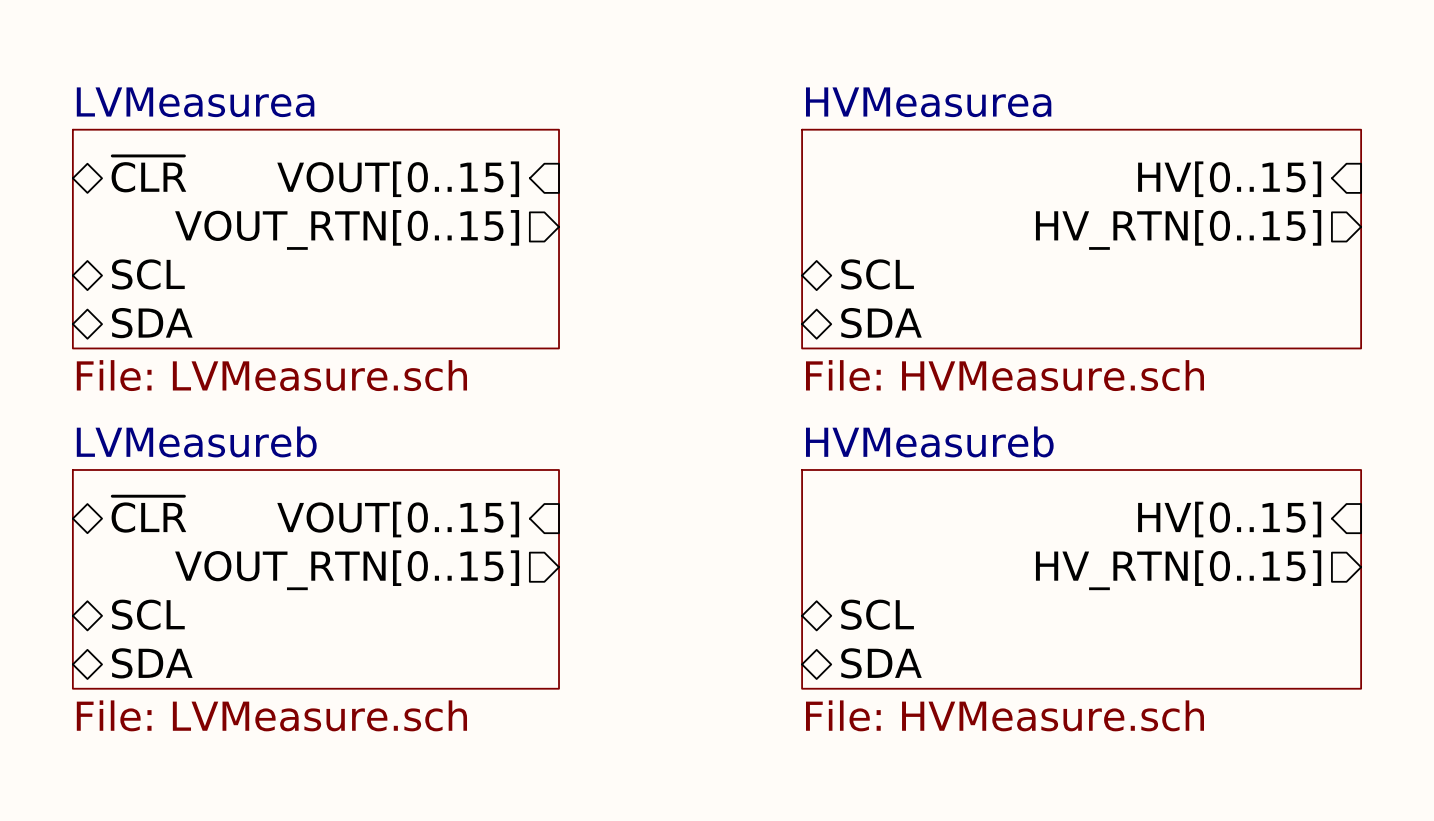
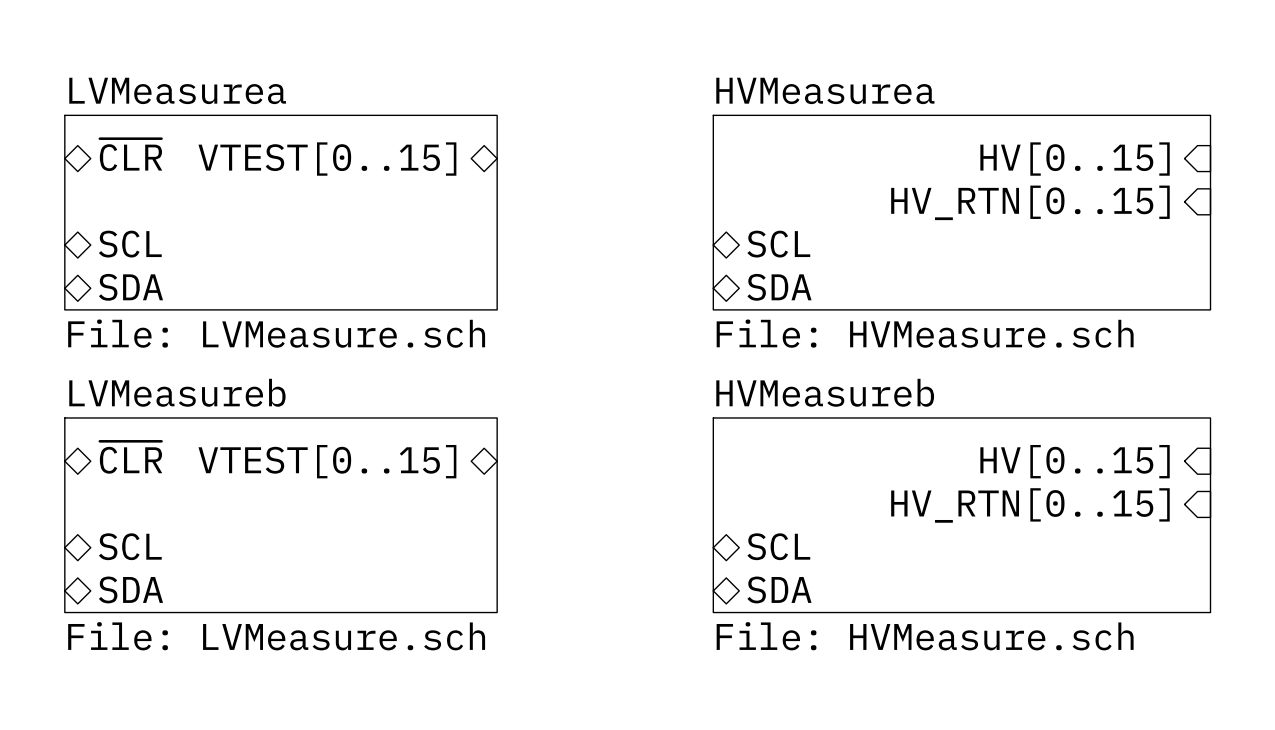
sheet pin shape: input (398, 179) -> bidirectional (327, 159)
sheet pin: VOUT[0..15] (398, 179) -> VTEST[0..15] (327, 159)
sheet pin: VOUT_RTN[0..15] (347, 229) -> none
sheet pin shape: output (1178, 229) -> input (1030, 202)
sheet pin shape: input (398, 519) -> bidirectional (327, 461)
sheet pin: VOUT[0..15] (398, 519) -> VTEST[0..15] (327, 461)
sheet pin: VOUT_RTN[0..15] (347, 570) -> none
sheet pin shape: output (1178, 570) -> input (1030, 505)

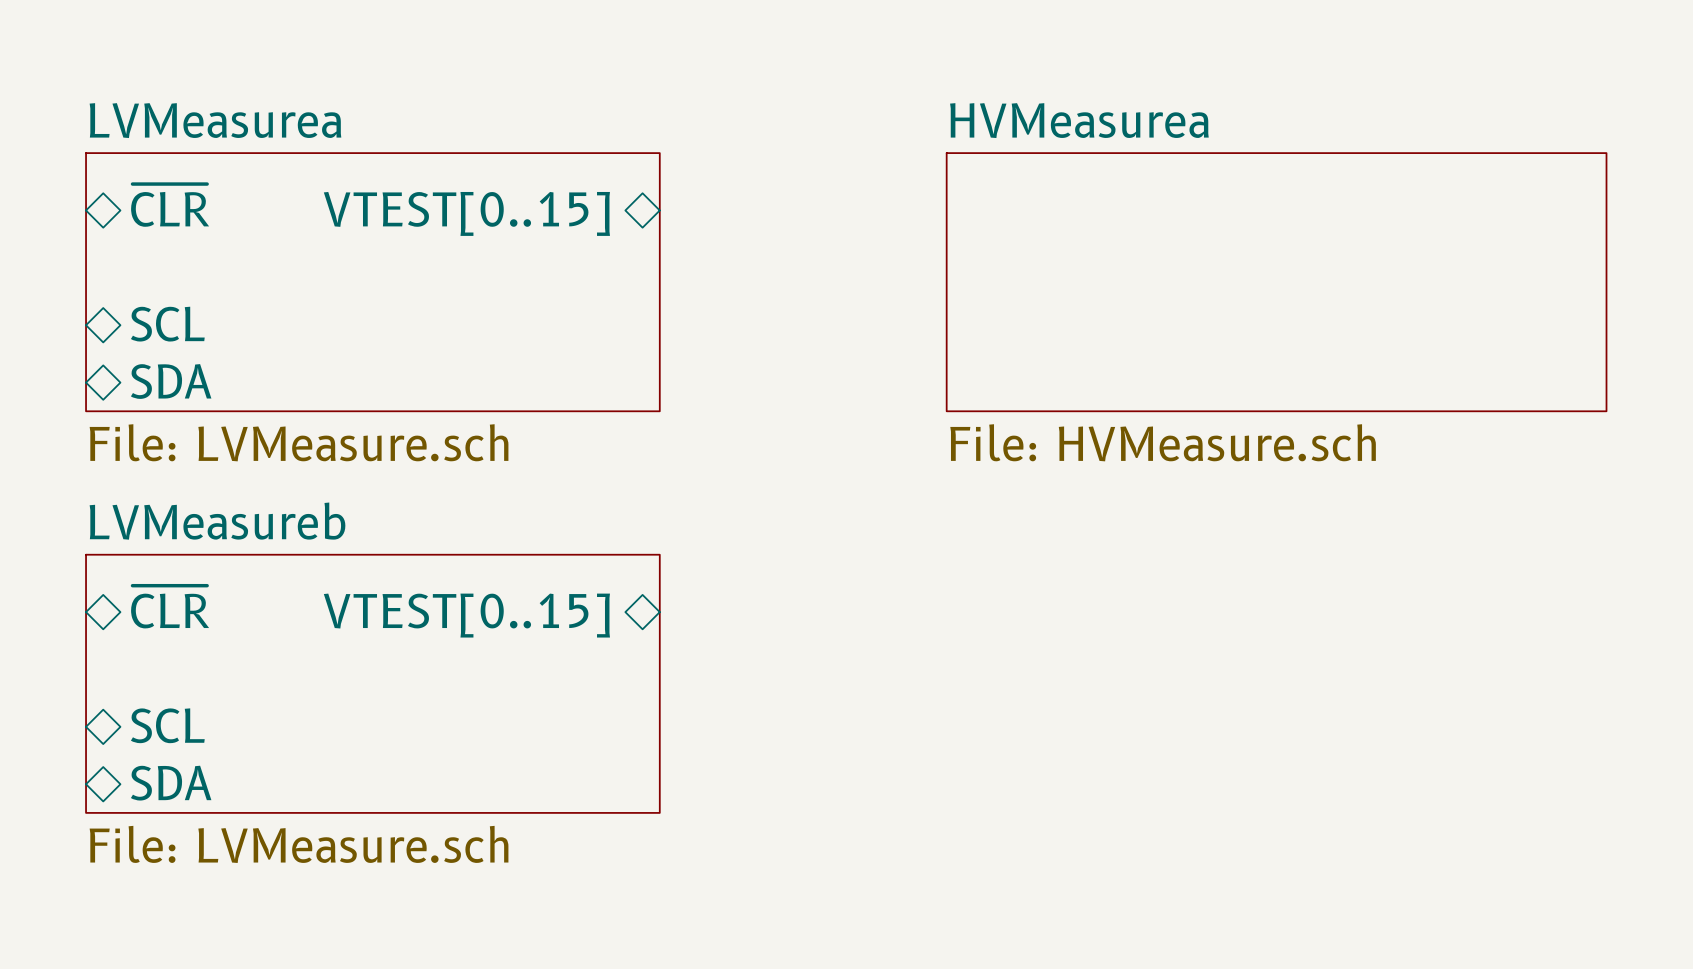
sheet pin: HV[0..15] (1075, 159) -> none
sheet pin: HV_RTN[0..15] (1030, 202) -> none
sheet pin: SCL (778, 244) -> none
sheet pin: SDA (779, 287) -> none
sheet pin: HV[0..15] (1075, 461) -> none
sheet pin: HV_RTN[0..15] (1030, 505) -> none
sheet HVMeasureb: File: HVMeasure.sch (961, 515) -> none
sheet pin: SCL (778, 546) -> none
sheet pin: SDA (779, 589) -> none

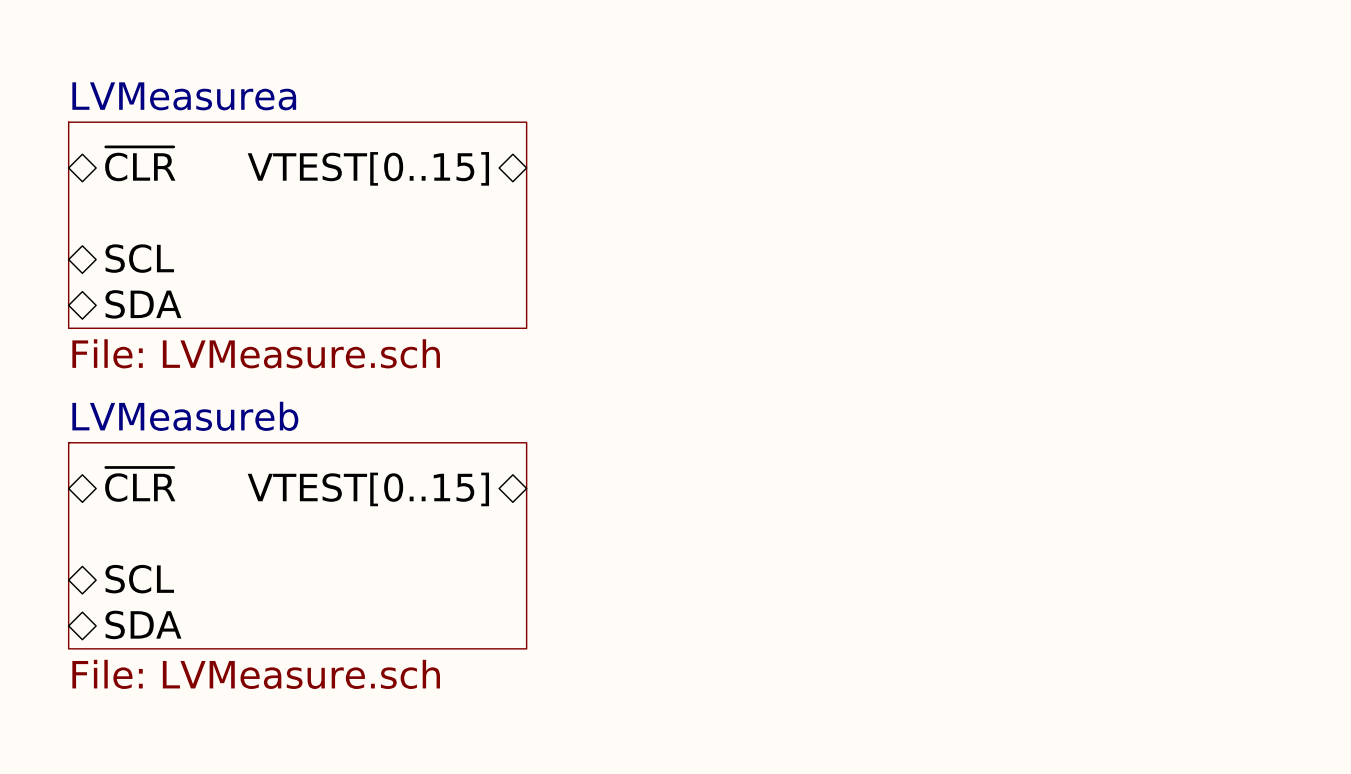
sheet HVMeasurea: File: HVMeasure.sch (1276, 282) -> none

